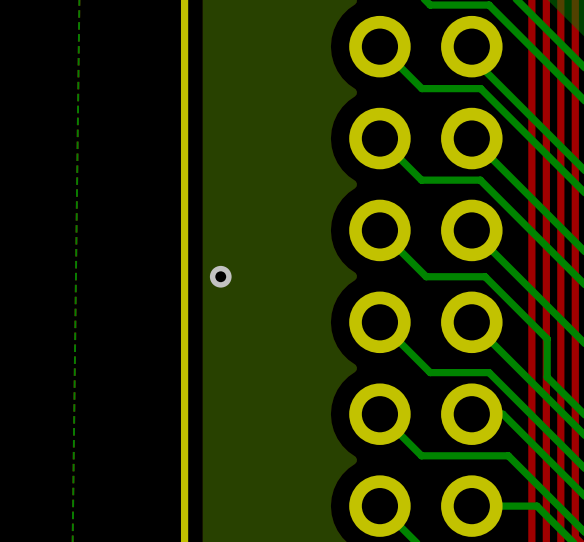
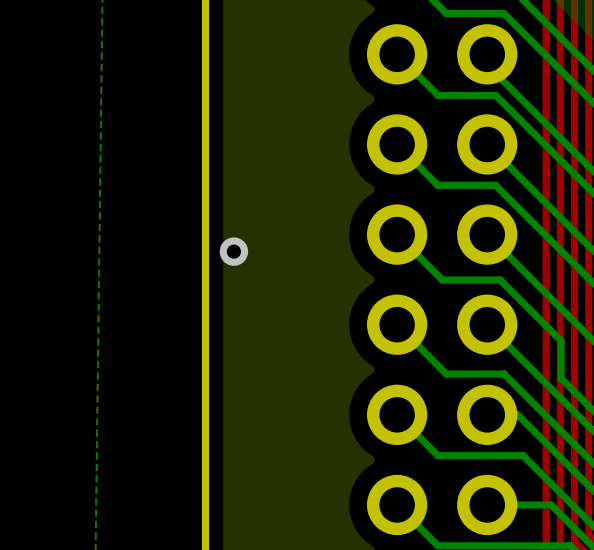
via: none -> (233, 251)
via: (220, 276) -> none

